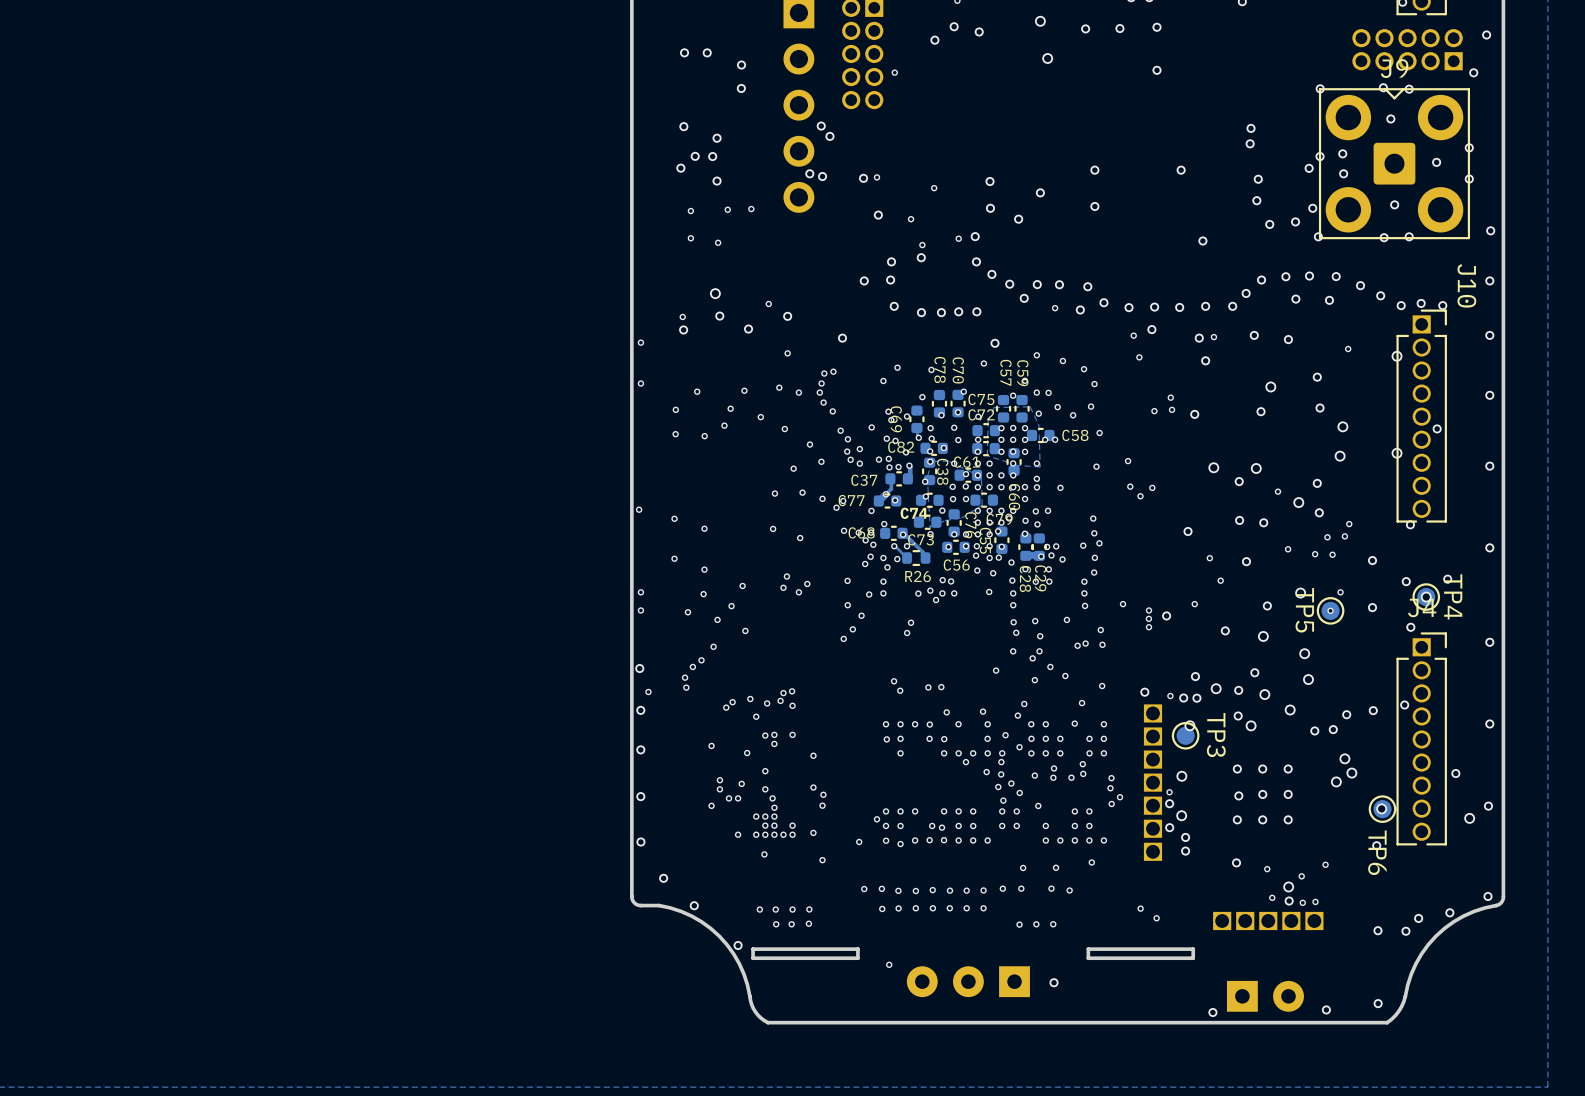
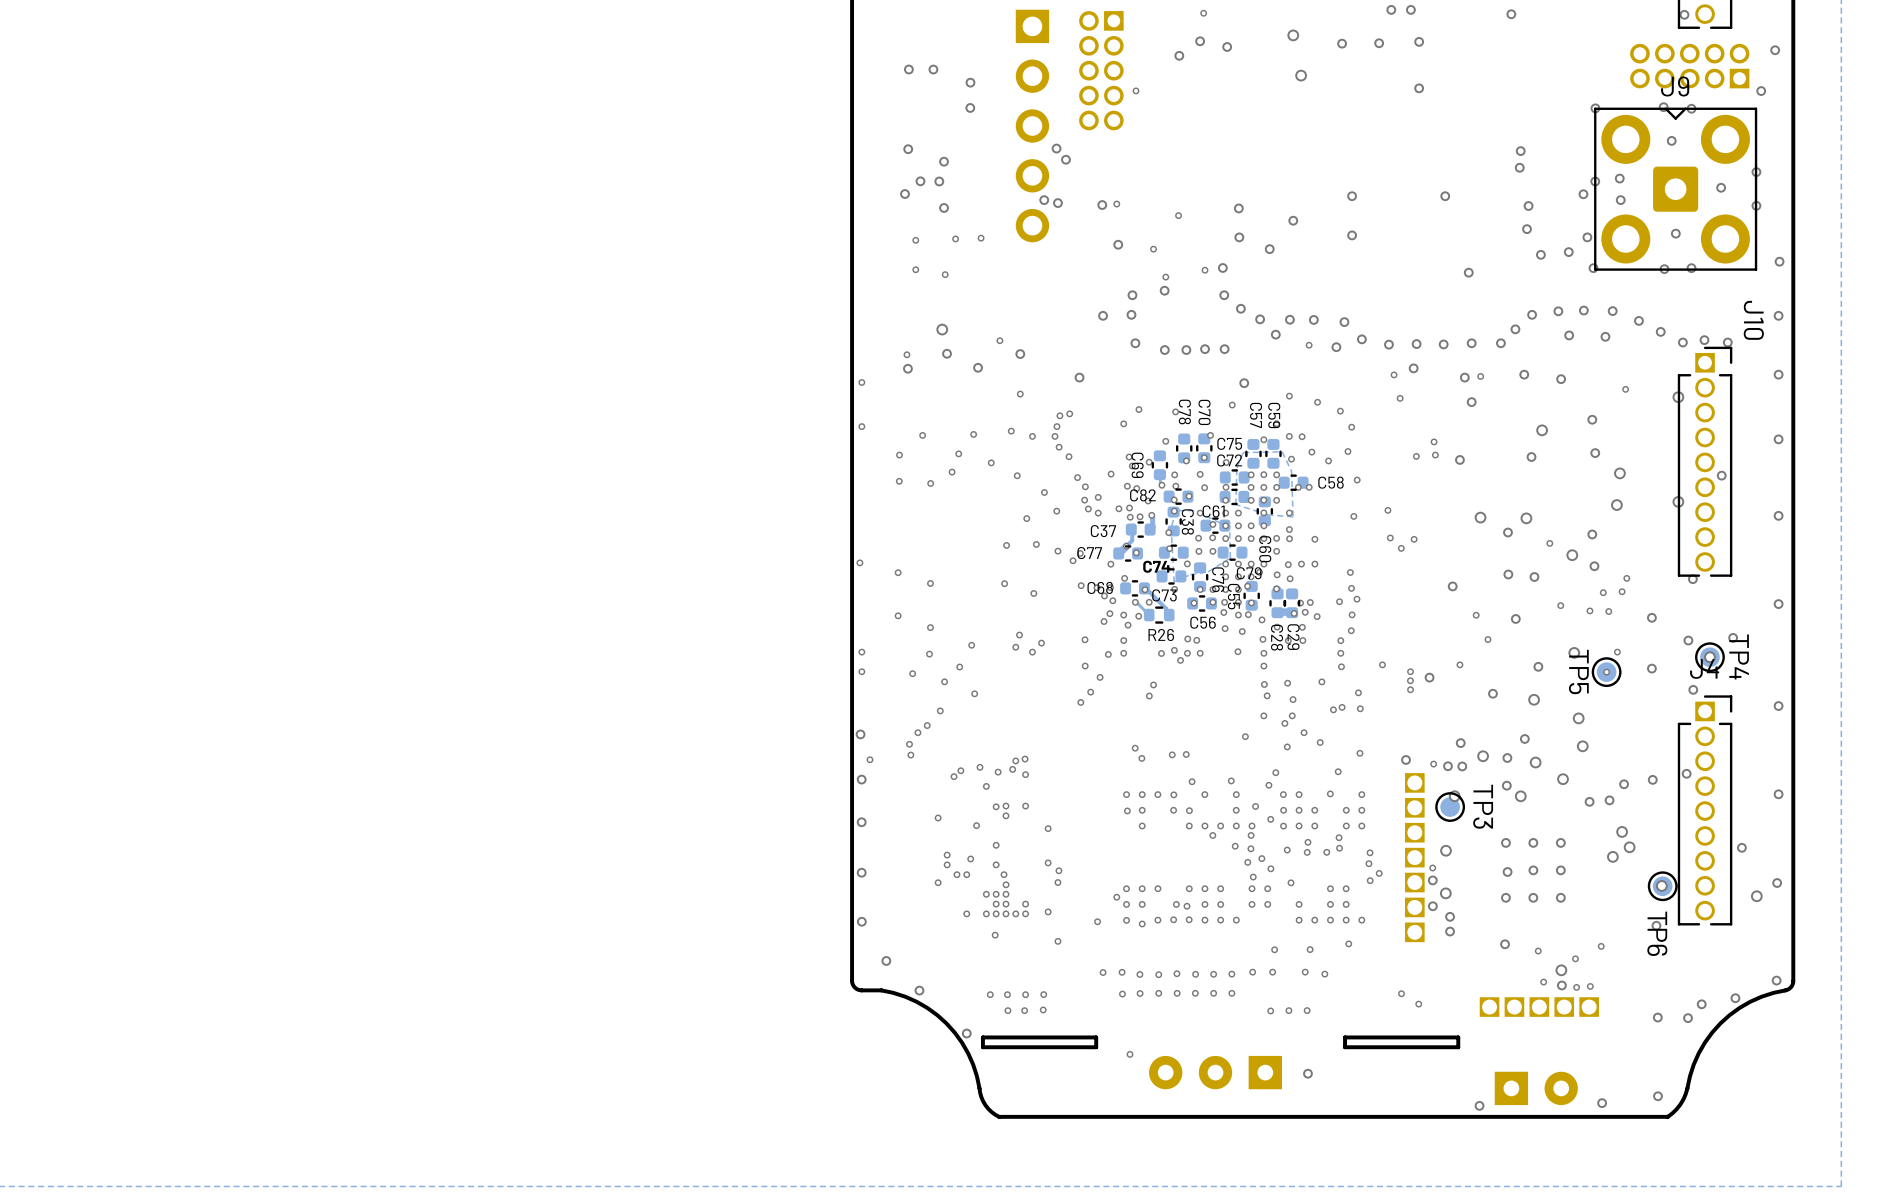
via: none -> (1314, 564)

